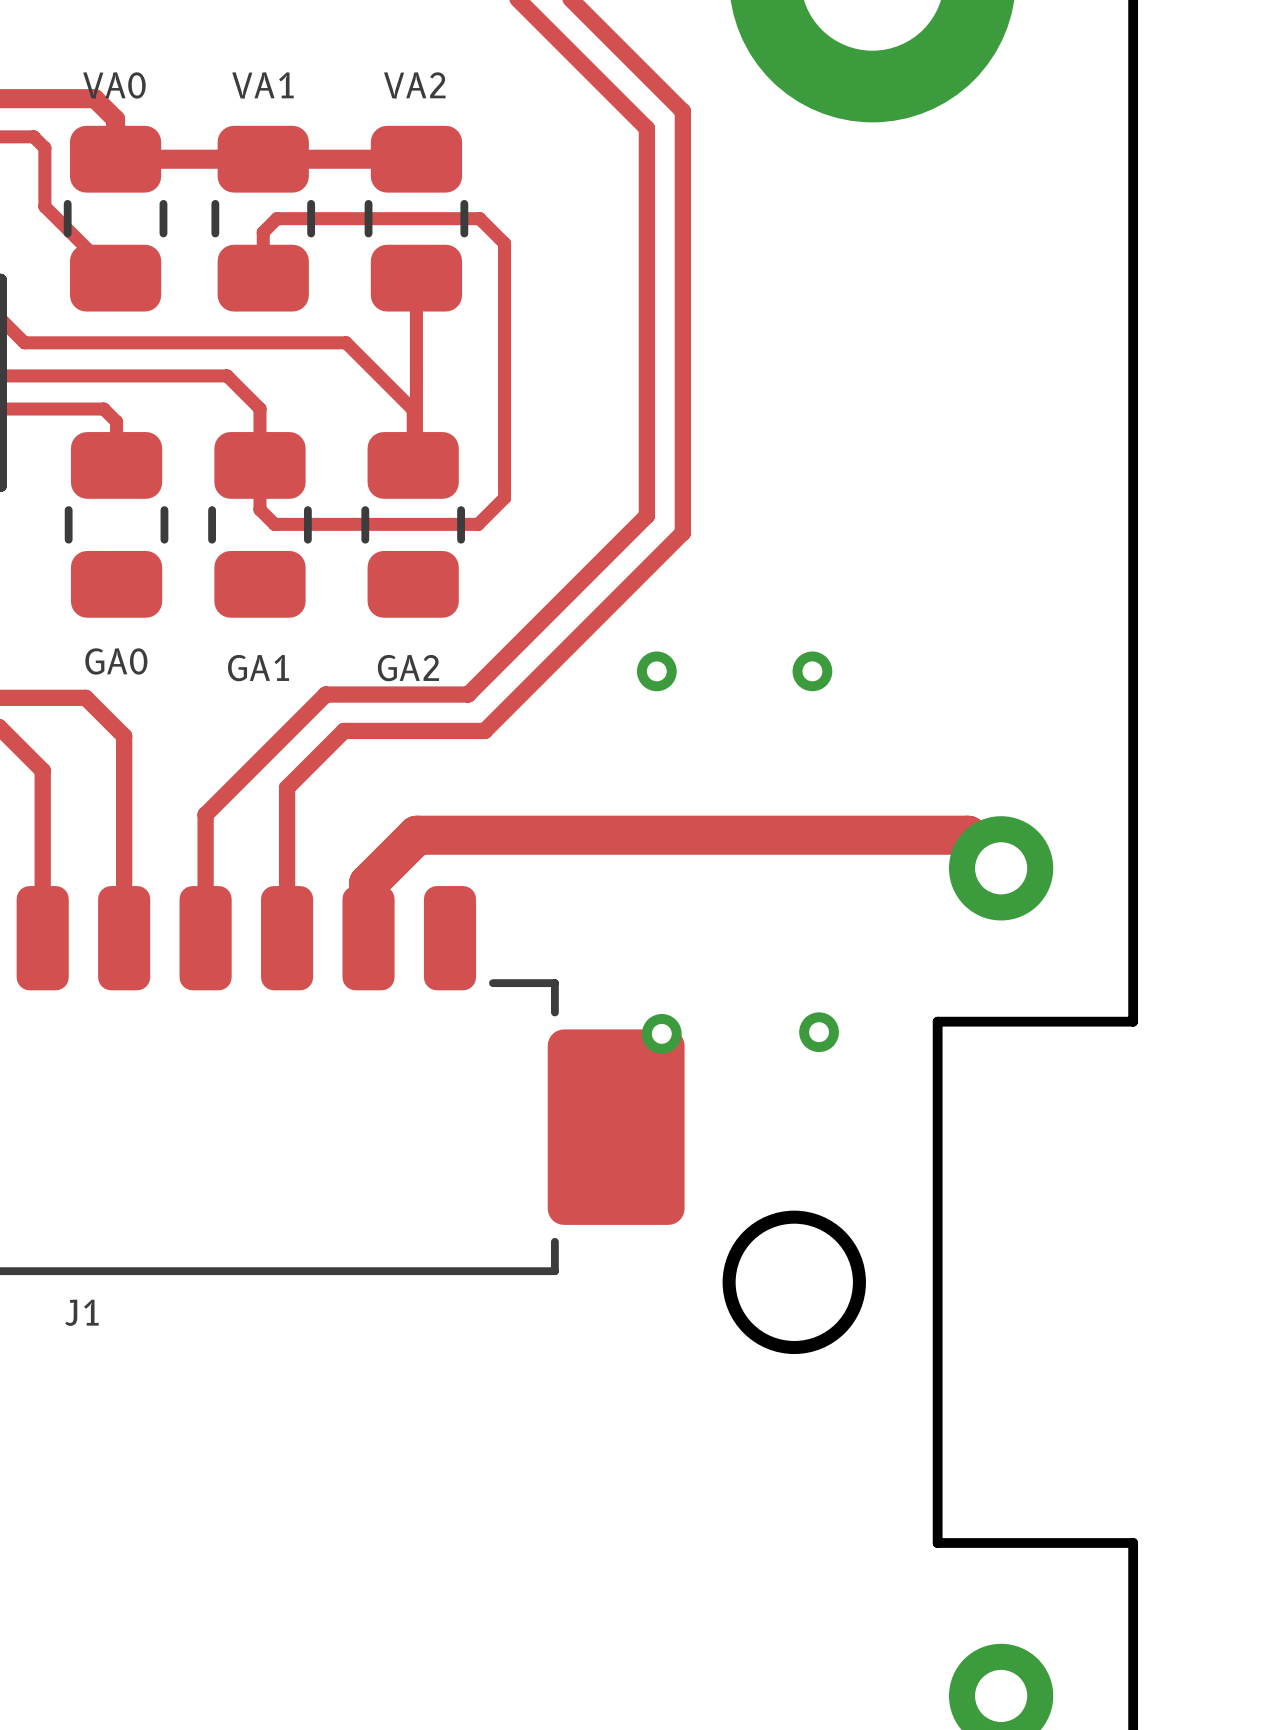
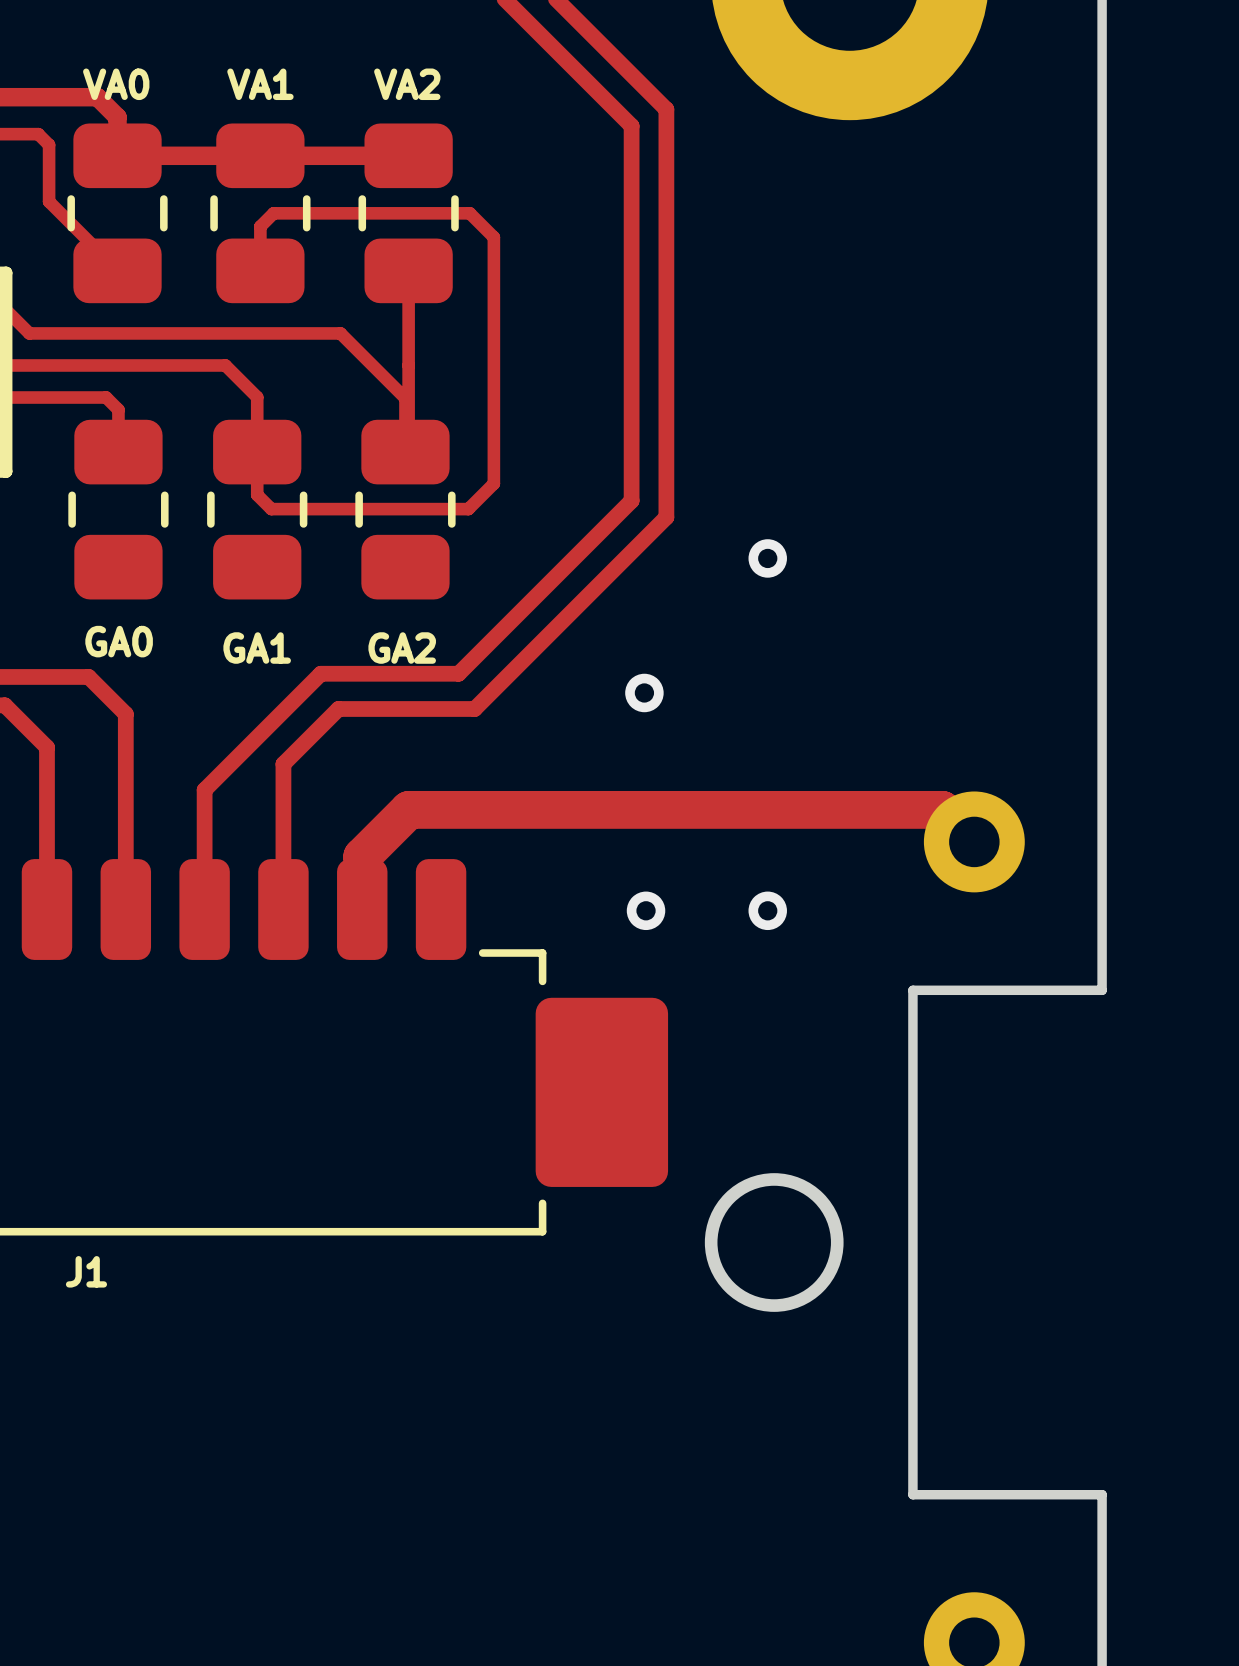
via: none -> (767, 558)
via position: (656, 671) -> (644, 692)
via: (812, 671) -> none
via: none -> (646, 910)
via: none -> (767, 910)
via: (819, 1032) -> none
via: (661, 1033) -> none

